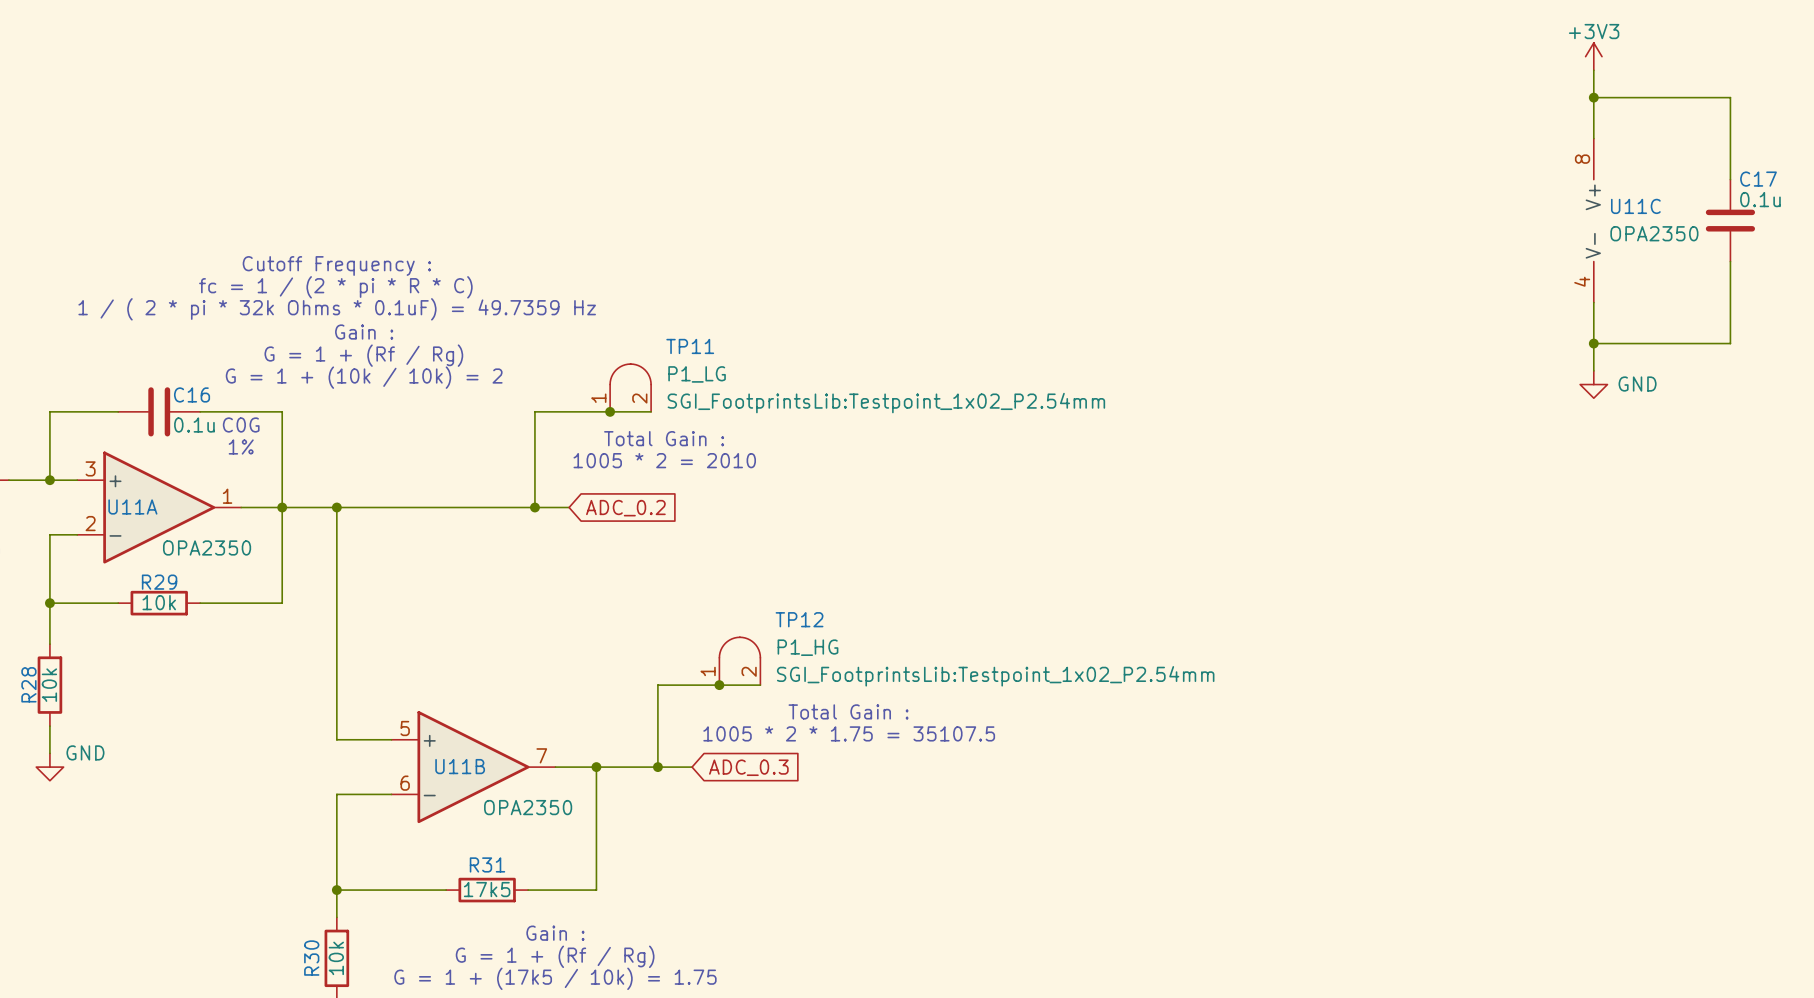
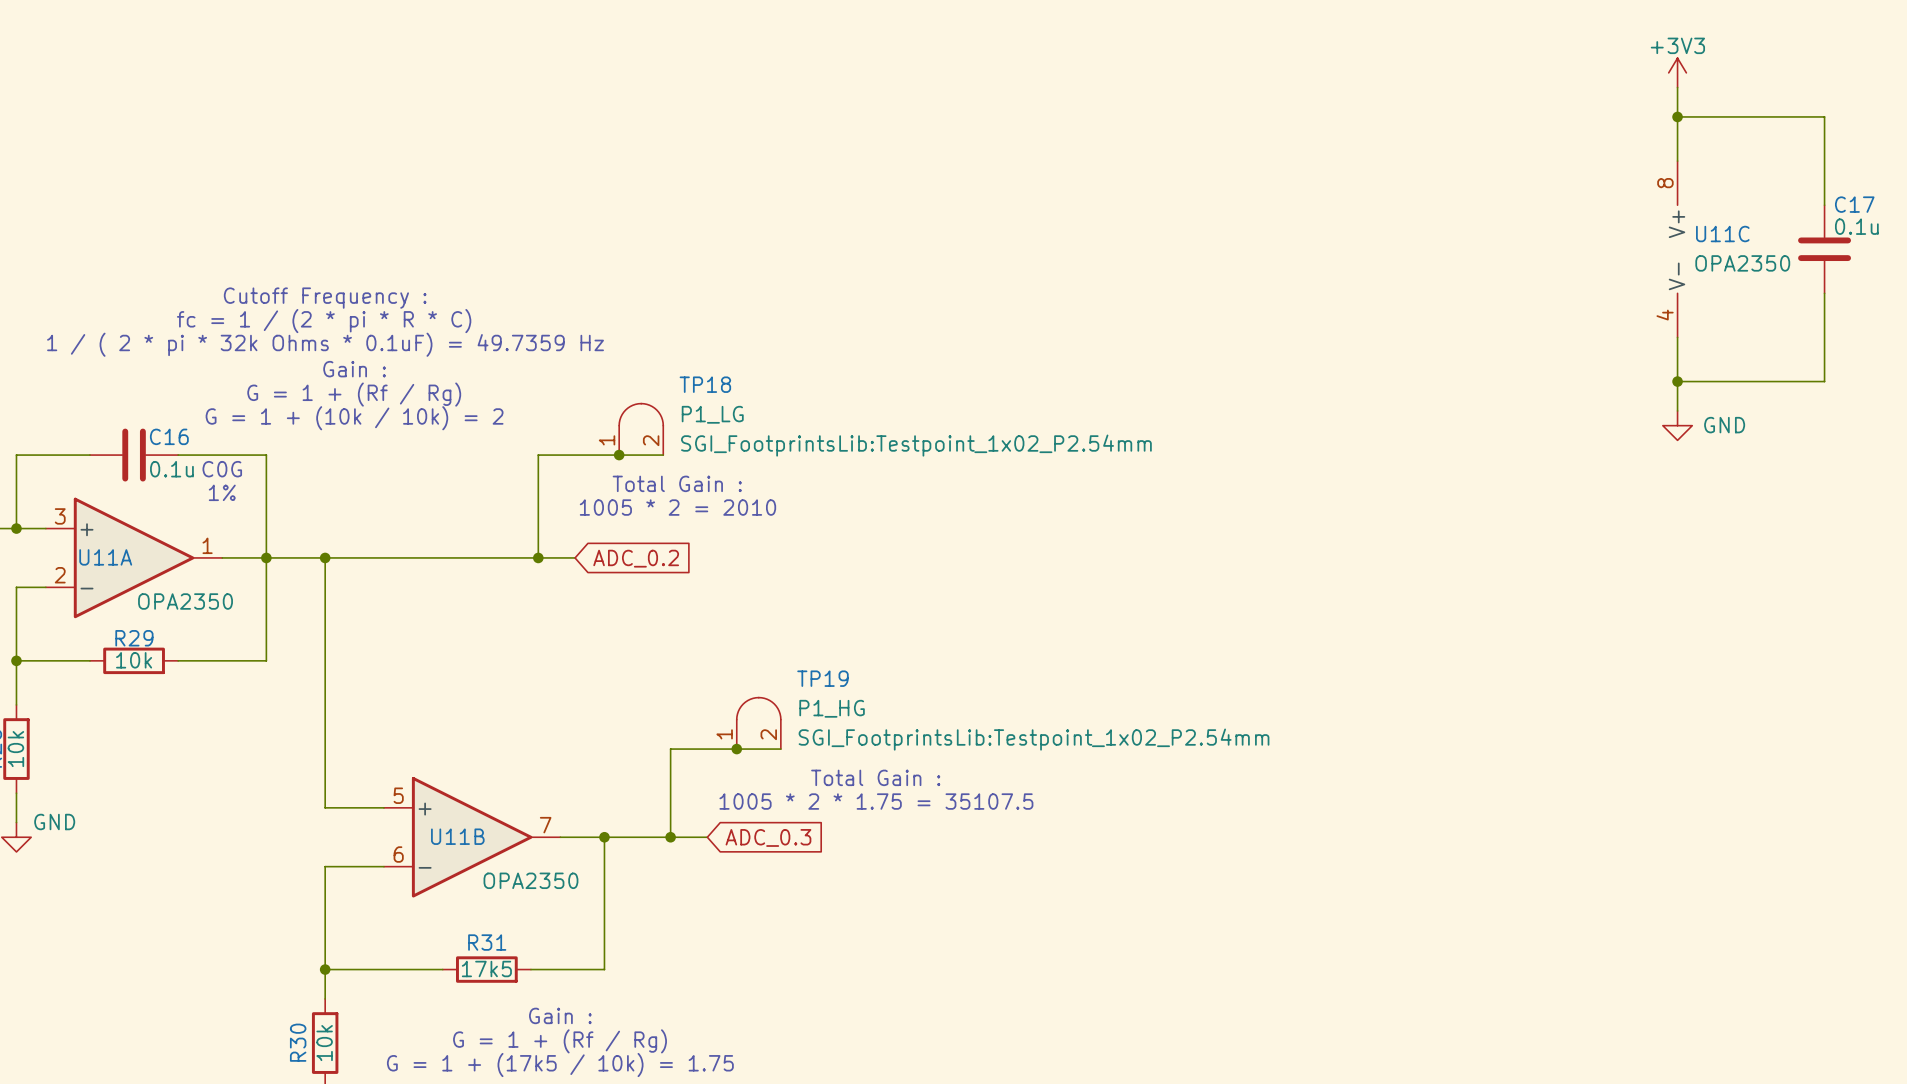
TP11 name: TP11 (690, 346) -> TP18 (705, 384)
TP12 name: TP12 (799, 619) -> TP19 (822, 678)

